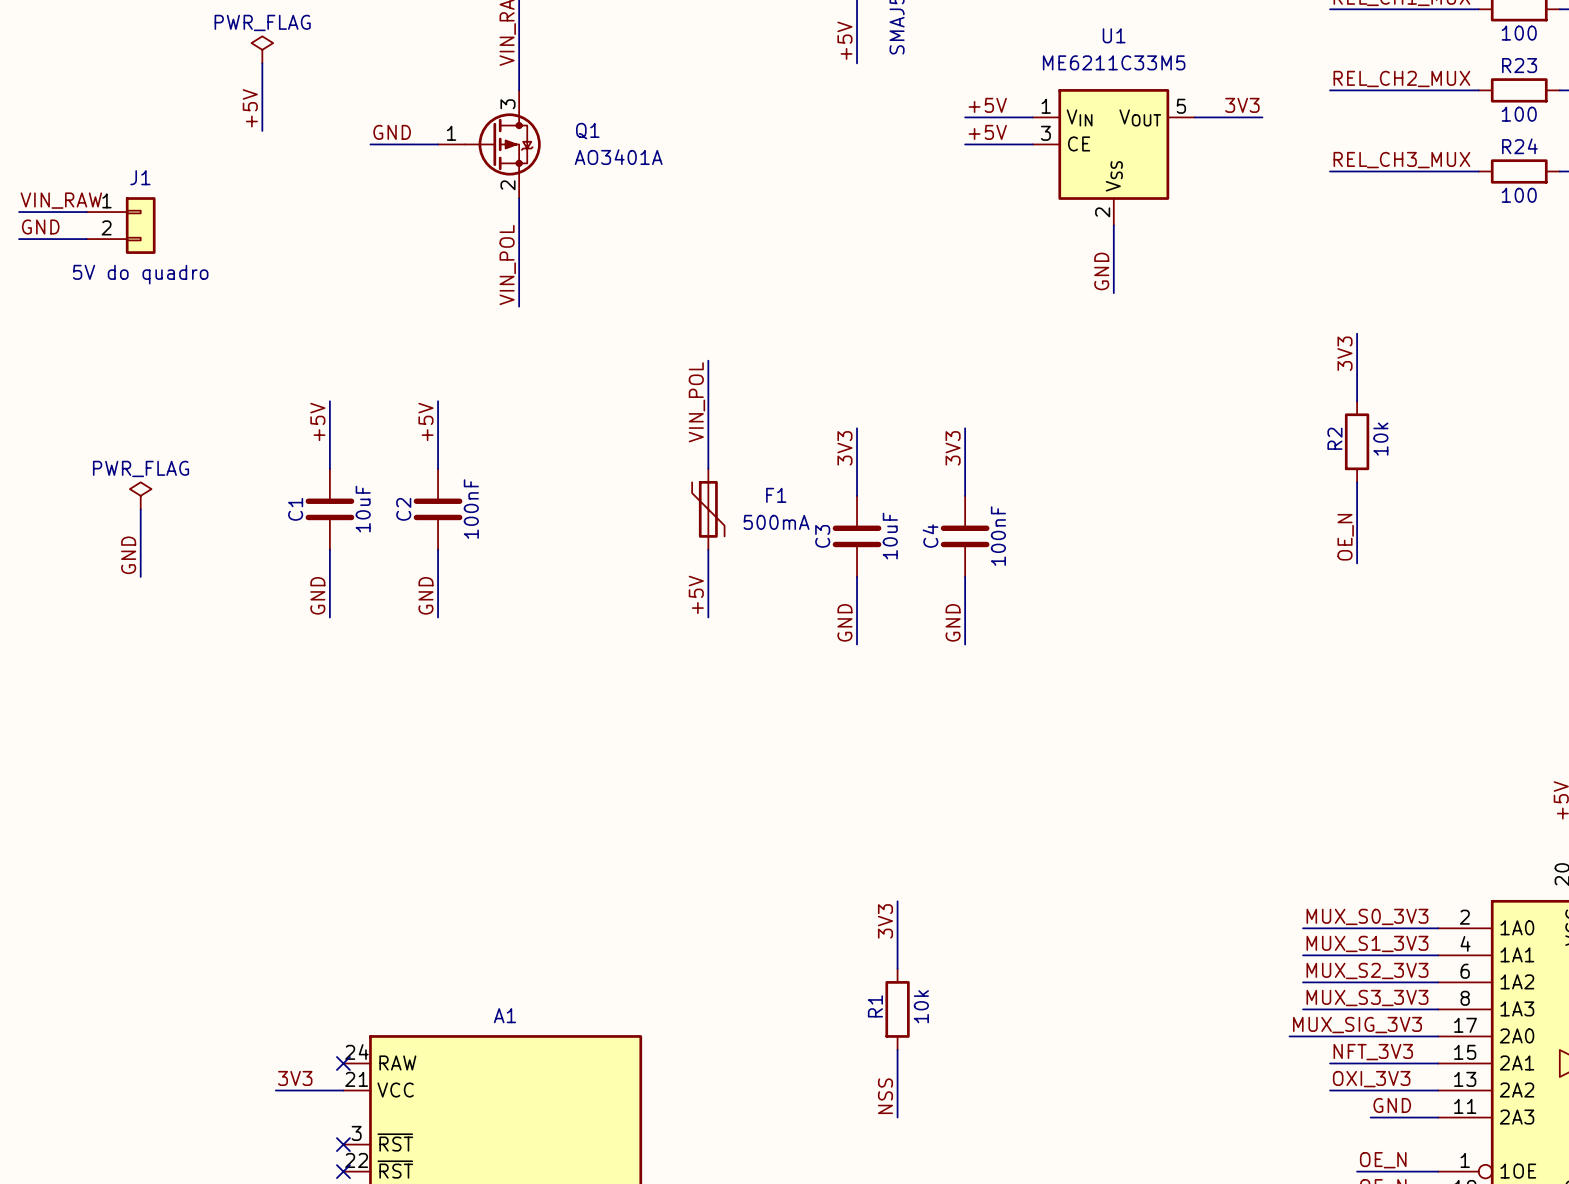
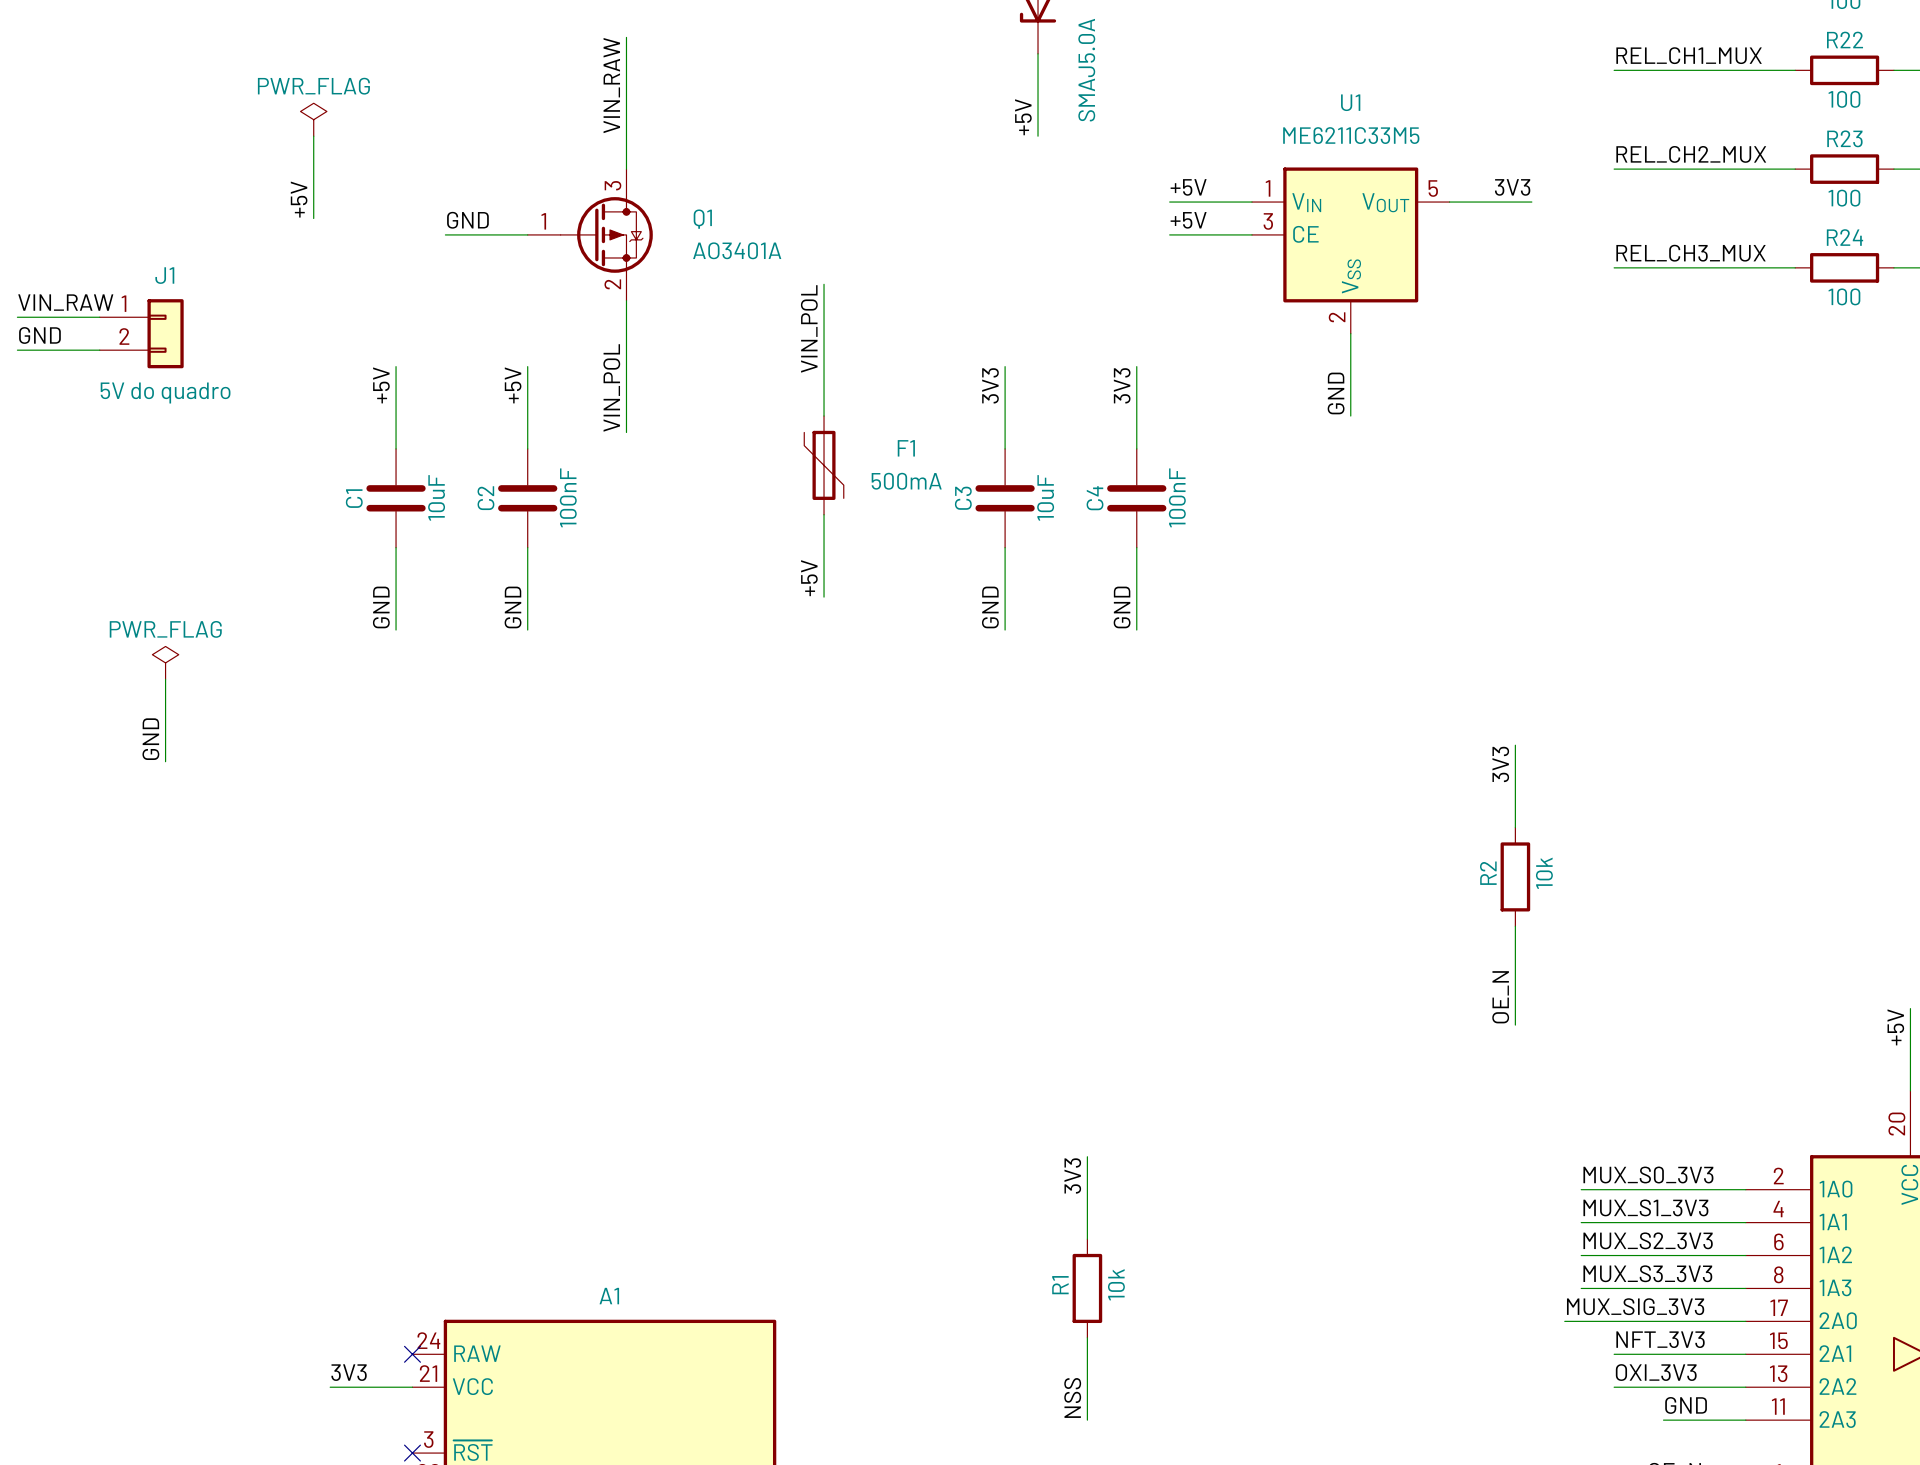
wire: none -> (396, 366) (396, 448)
wire: none -> (527, 366) (527, 448)
label: none -> 3V3 (990, 385)
label: none -> 3V3 (1122, 385)
label: none -> +5V (381, 385)
label: none -> +5V (513, 385)
wire: (1357, 333) (1357, 401) -> (1515, 745) (1515, 827)
label: 3V3 (1345, 353) -> none
wire: (708, 360) (708, 468) -> (824, 284) (824, 416)
label position: VIN_POL (696, 402) -> VIN_POL (809, 328)
label: none -> +5V (809, 578)
label: +5V (317, 421) -> none
label: +5V (425, 421) -> none
wire: (857, 428) (857, 495) -> (1005, 366) (1005, 448)
wire: (965, 428) (965, 495) -> (1136, 366) (1136, 448)
R2 position: (1357, 441) -> (1515, 876)
label: none -> GND (381, 607)
label: none -> GND (513, 607)
label: none -> GND (990, 607)
label: none -> GND (1122, 607)
label: 3V3 (844, 448) -> none
label: 3V3 (953, 448) -> none
wire: (1357, 482) (1357, 563) -> (1515, 926) (1515, 1025)
C1 position: (329, 509) -> (396, 498)
C2 position: (438, 509) -> (527, 498)
F1 position: (708, 509) -> (824, 465)
C3 position: (857, 536) -> (1005, 498)
C4 position: (965, 536) -> (1136, 498)
label position: OE_N (1345, 537) -> OE_N (1500, 997)
wire: (329, 549) (329, 617) -> none
wire: (438, 549) (438, 617) -> none
wire: (708, 549) (708, 617) -> (824, 514) (824, 597)
wire: (857, 576) (857, 644) -> (1005, 547) (1005, 630)
wire: (965, 576) (965, 644) -> (1136, 547) (1136, 630)
label: none -> 3V3 (1500, 764)
label: +5V (696, 594) -> none
label: GND (317, 595) -> none
label: GND (425, 595) -> none
label: GND (844, 622) -> none
label: GND (953, 622) -> none

